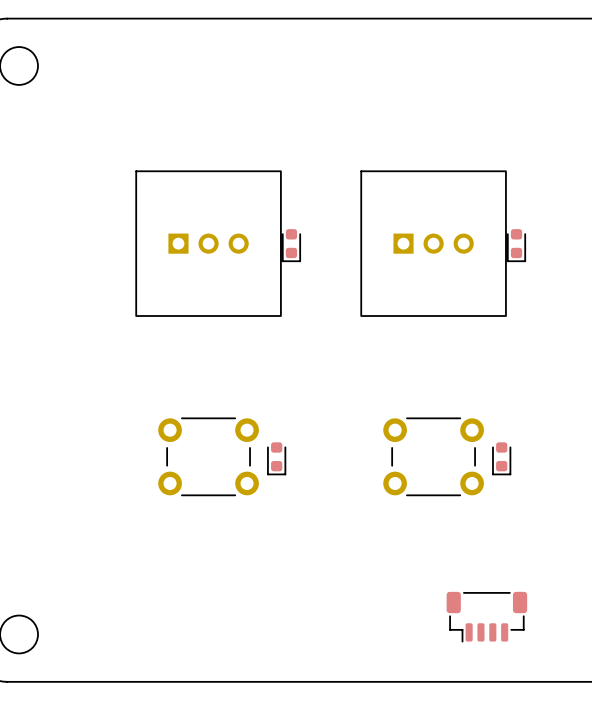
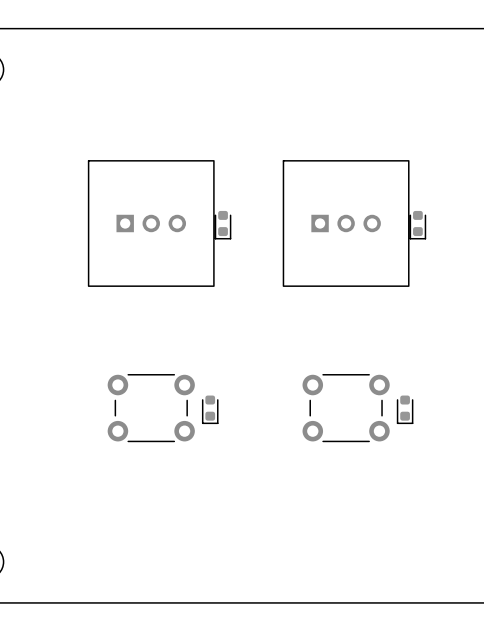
part: (486, 617) -> none

